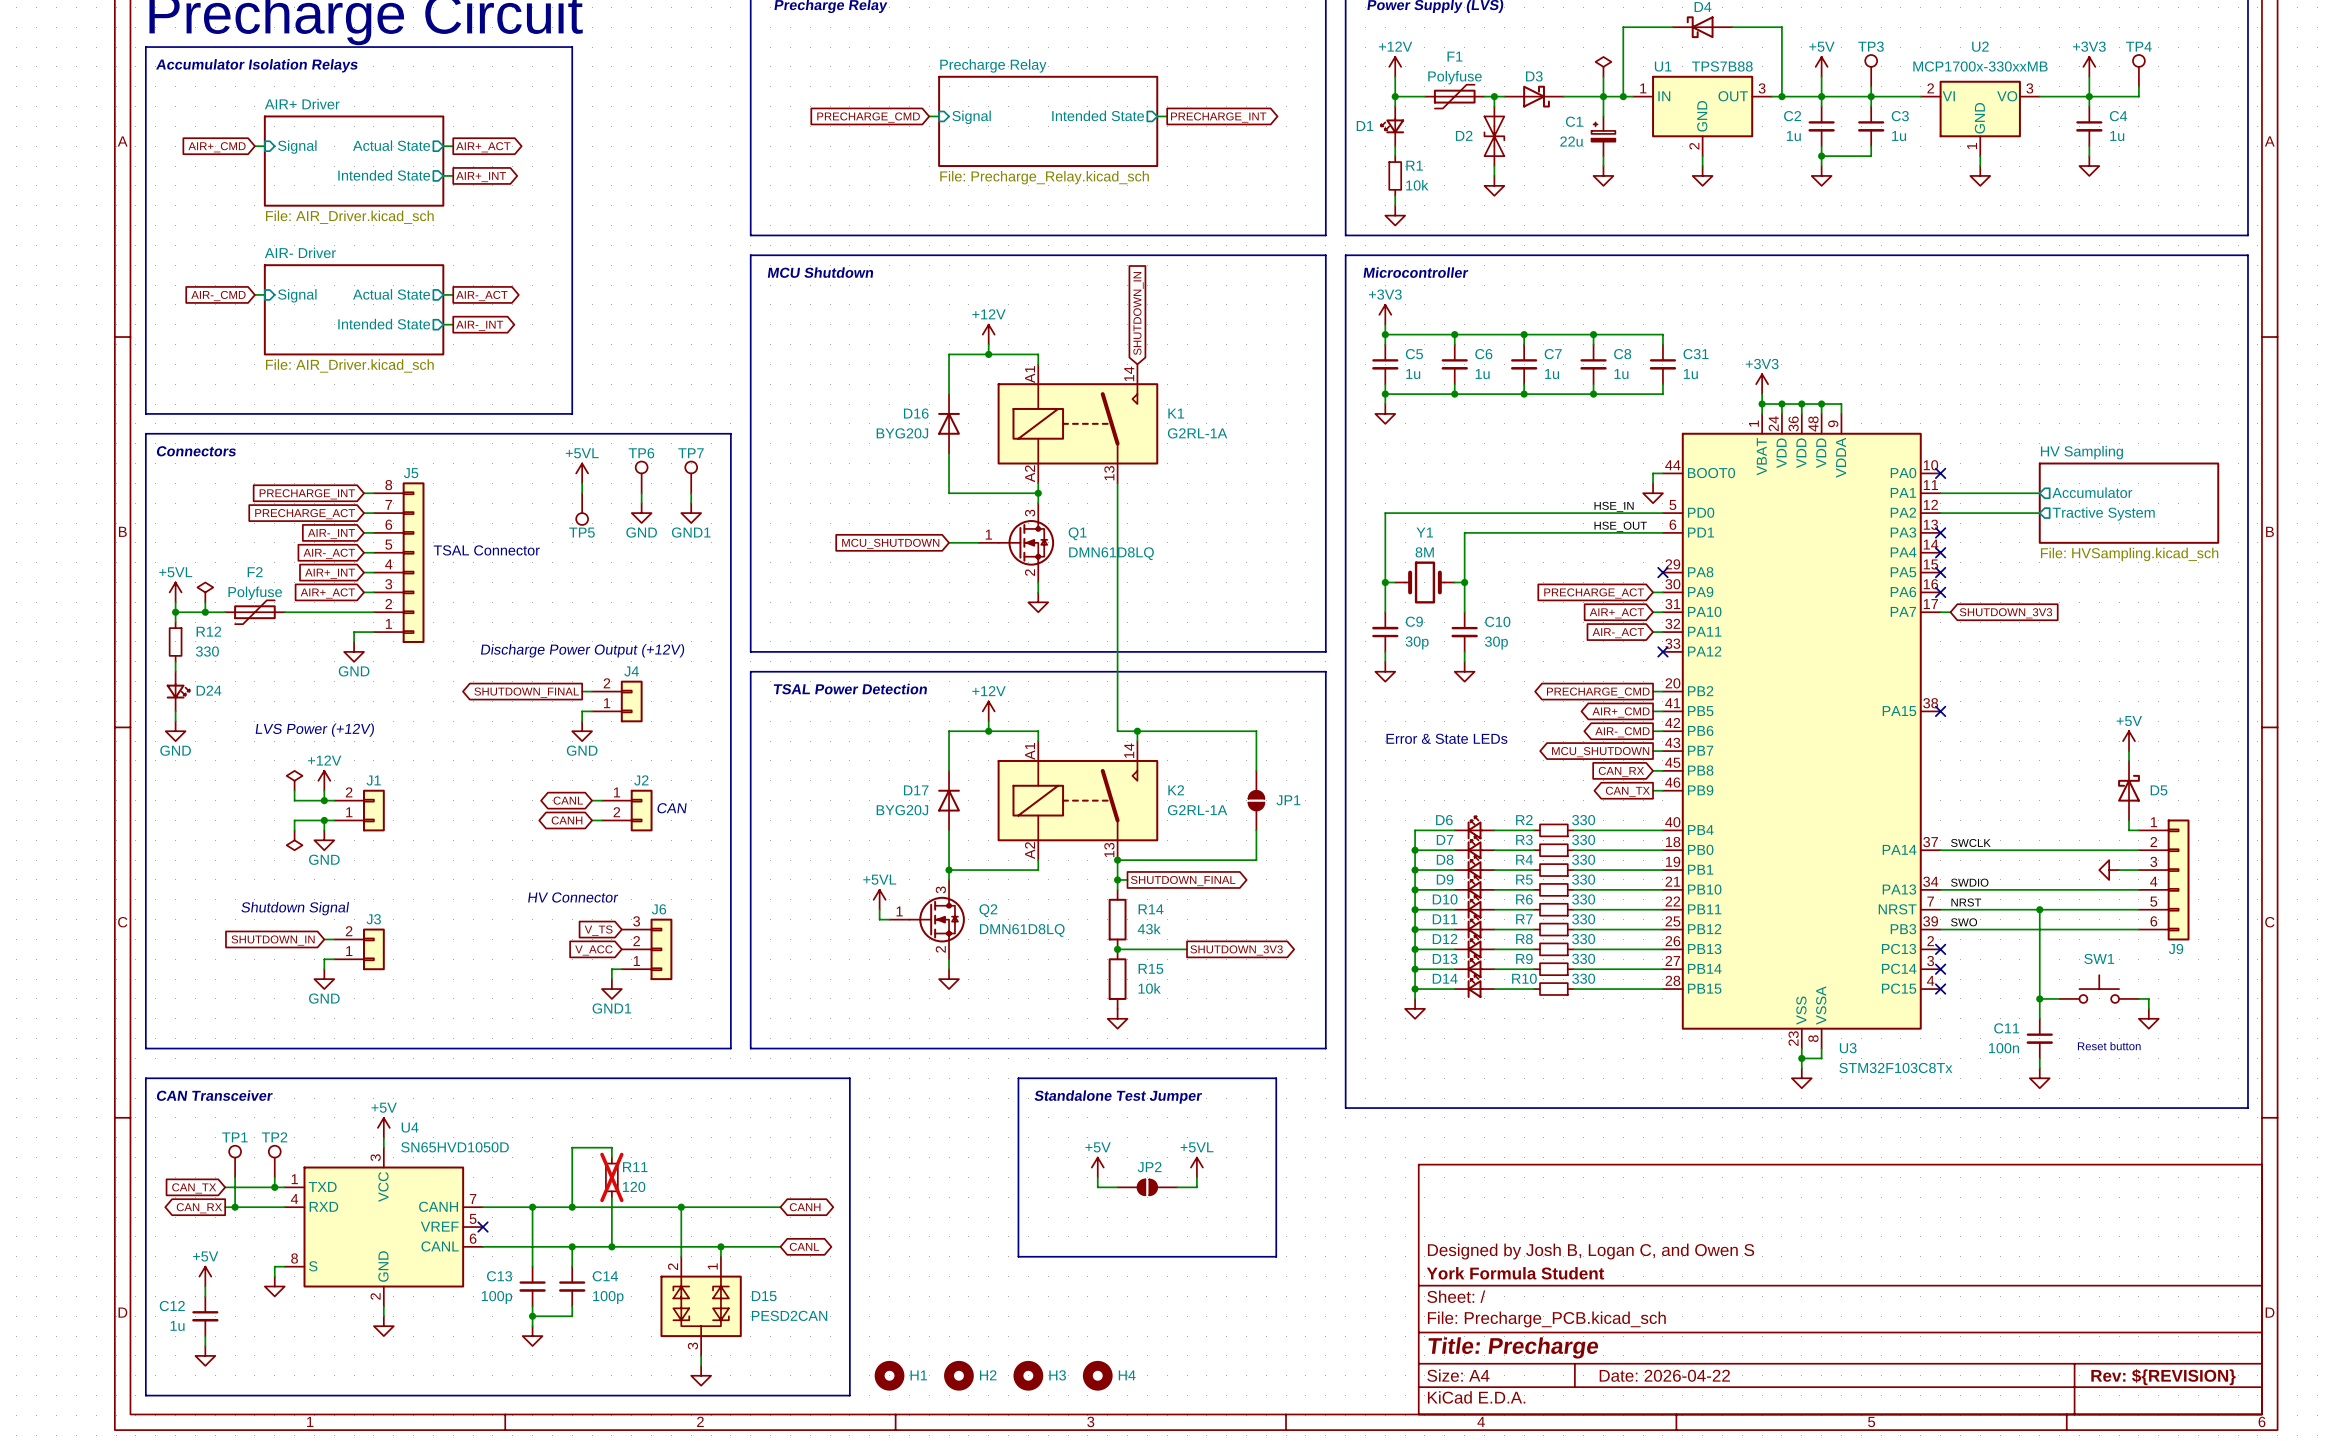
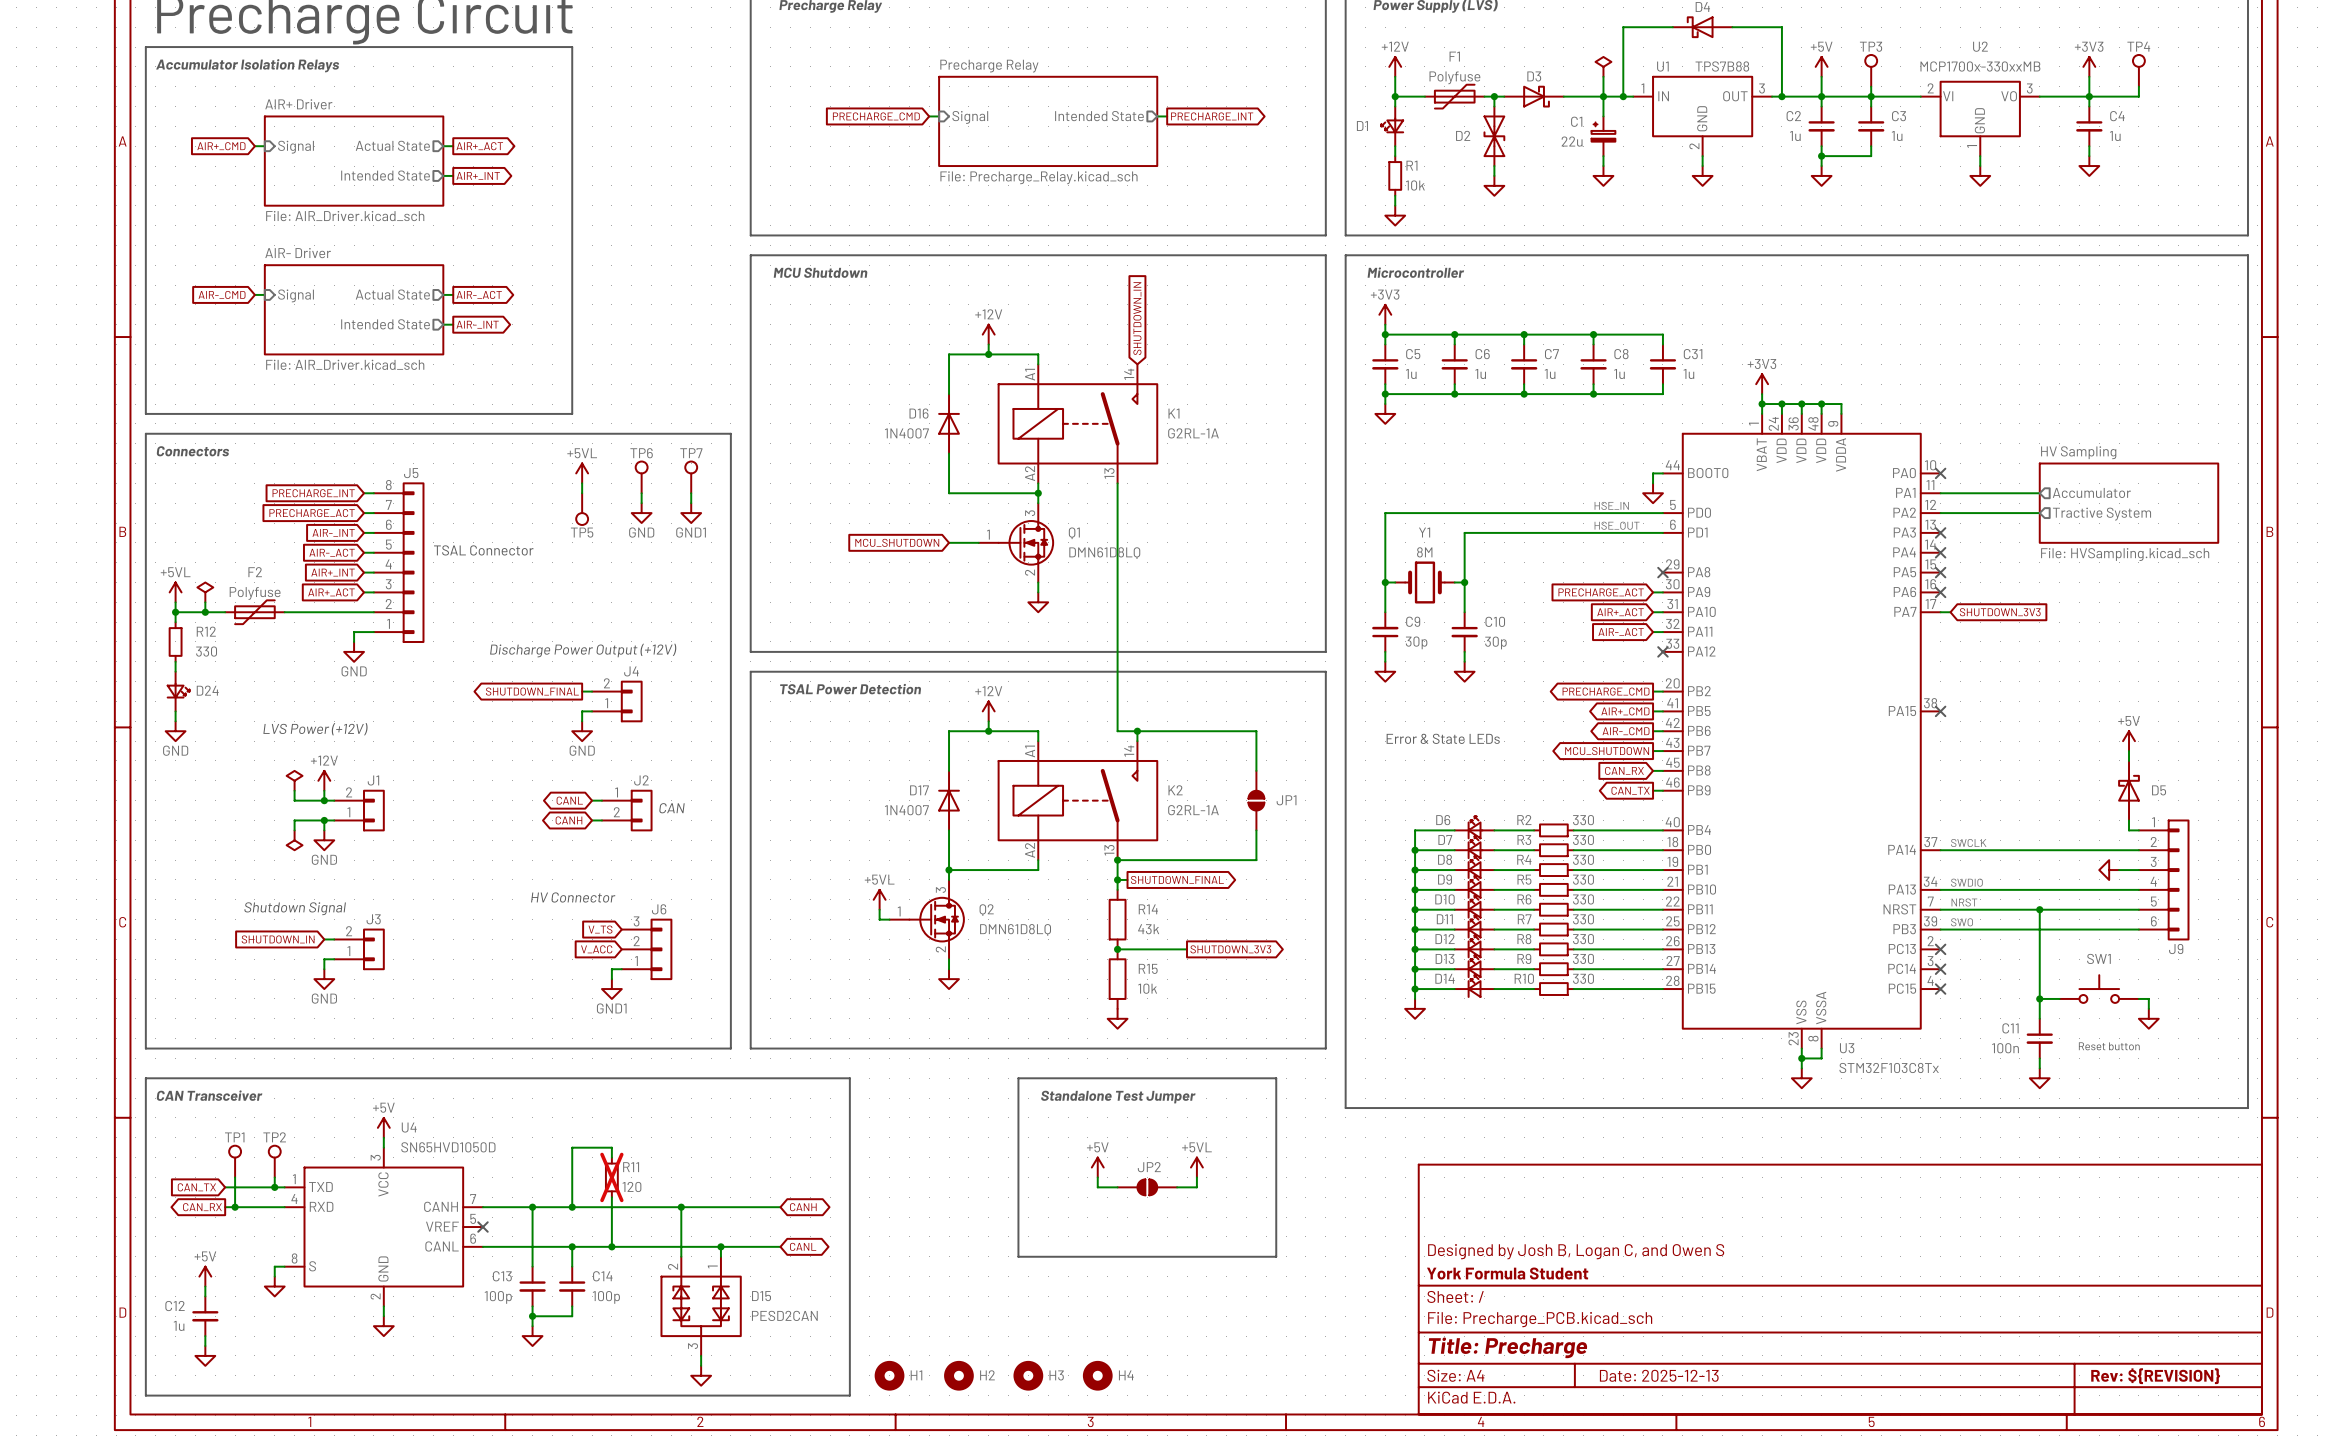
D16 value: BYG20J (902, 433) -> 1N4007 (906, 433)
D17 value: BYG20J (902, 810) -> 1N4007 (906, 810)
title block: Date: 2026-04-22 (1664, 1375) -> Date: 2025-12-13 (1659, 1375)

